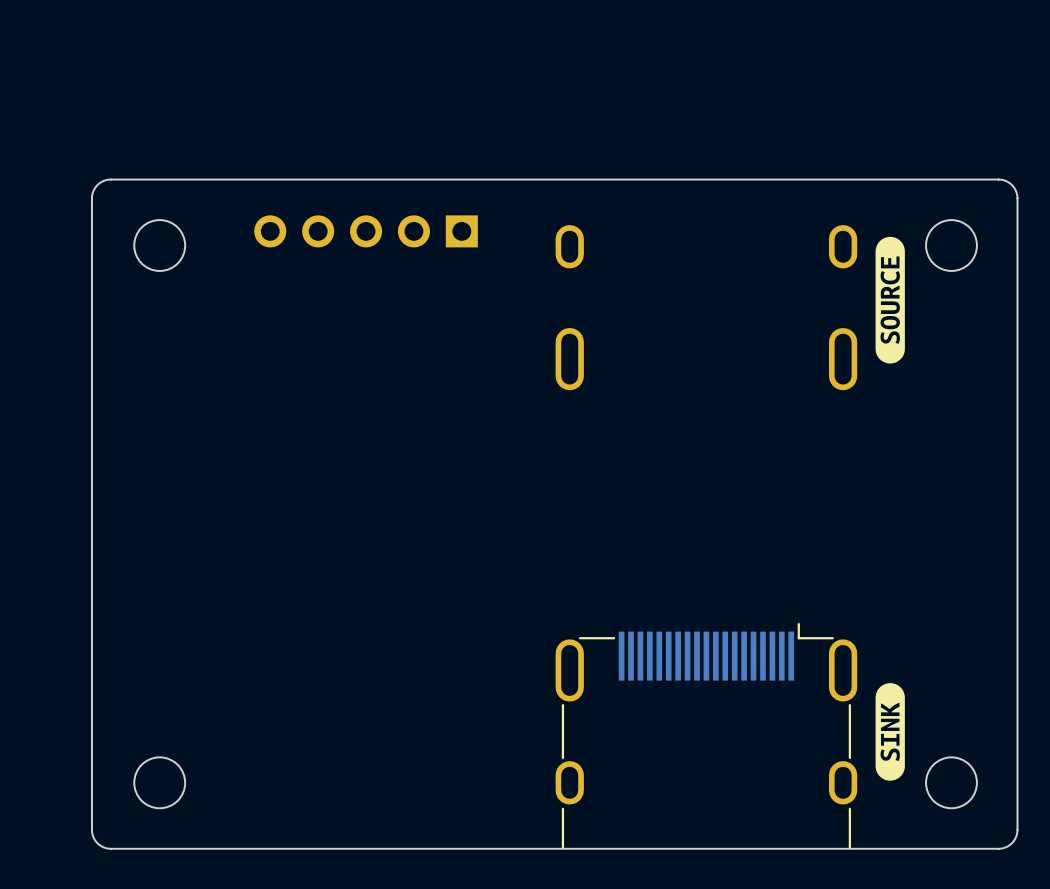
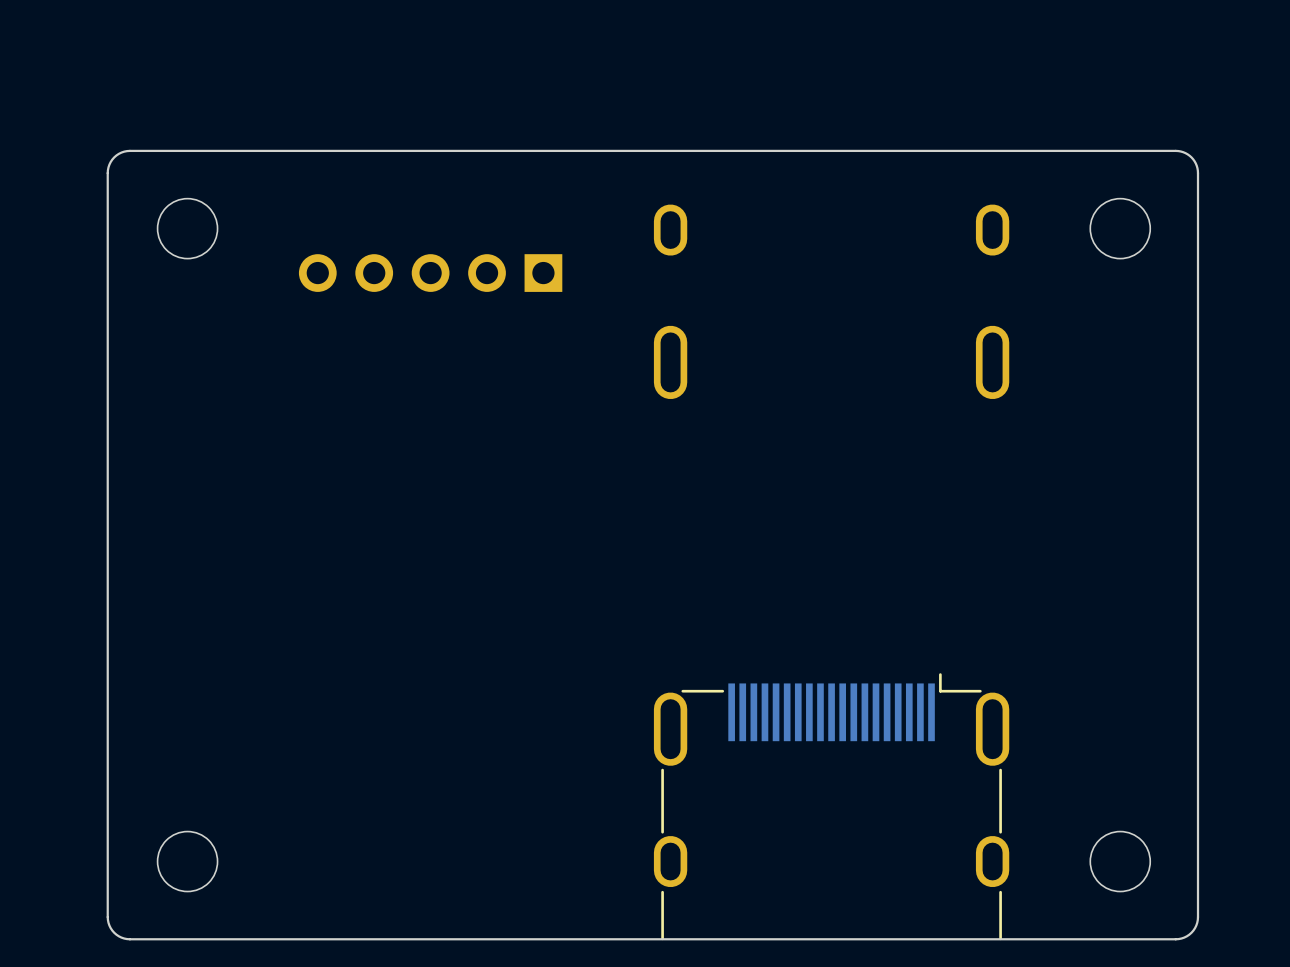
part position: (366, 231) -> (430, 273)
drawing: [875, 236, 905, 364] -> none
drawing: [875, 683, 905, 781] -> none

